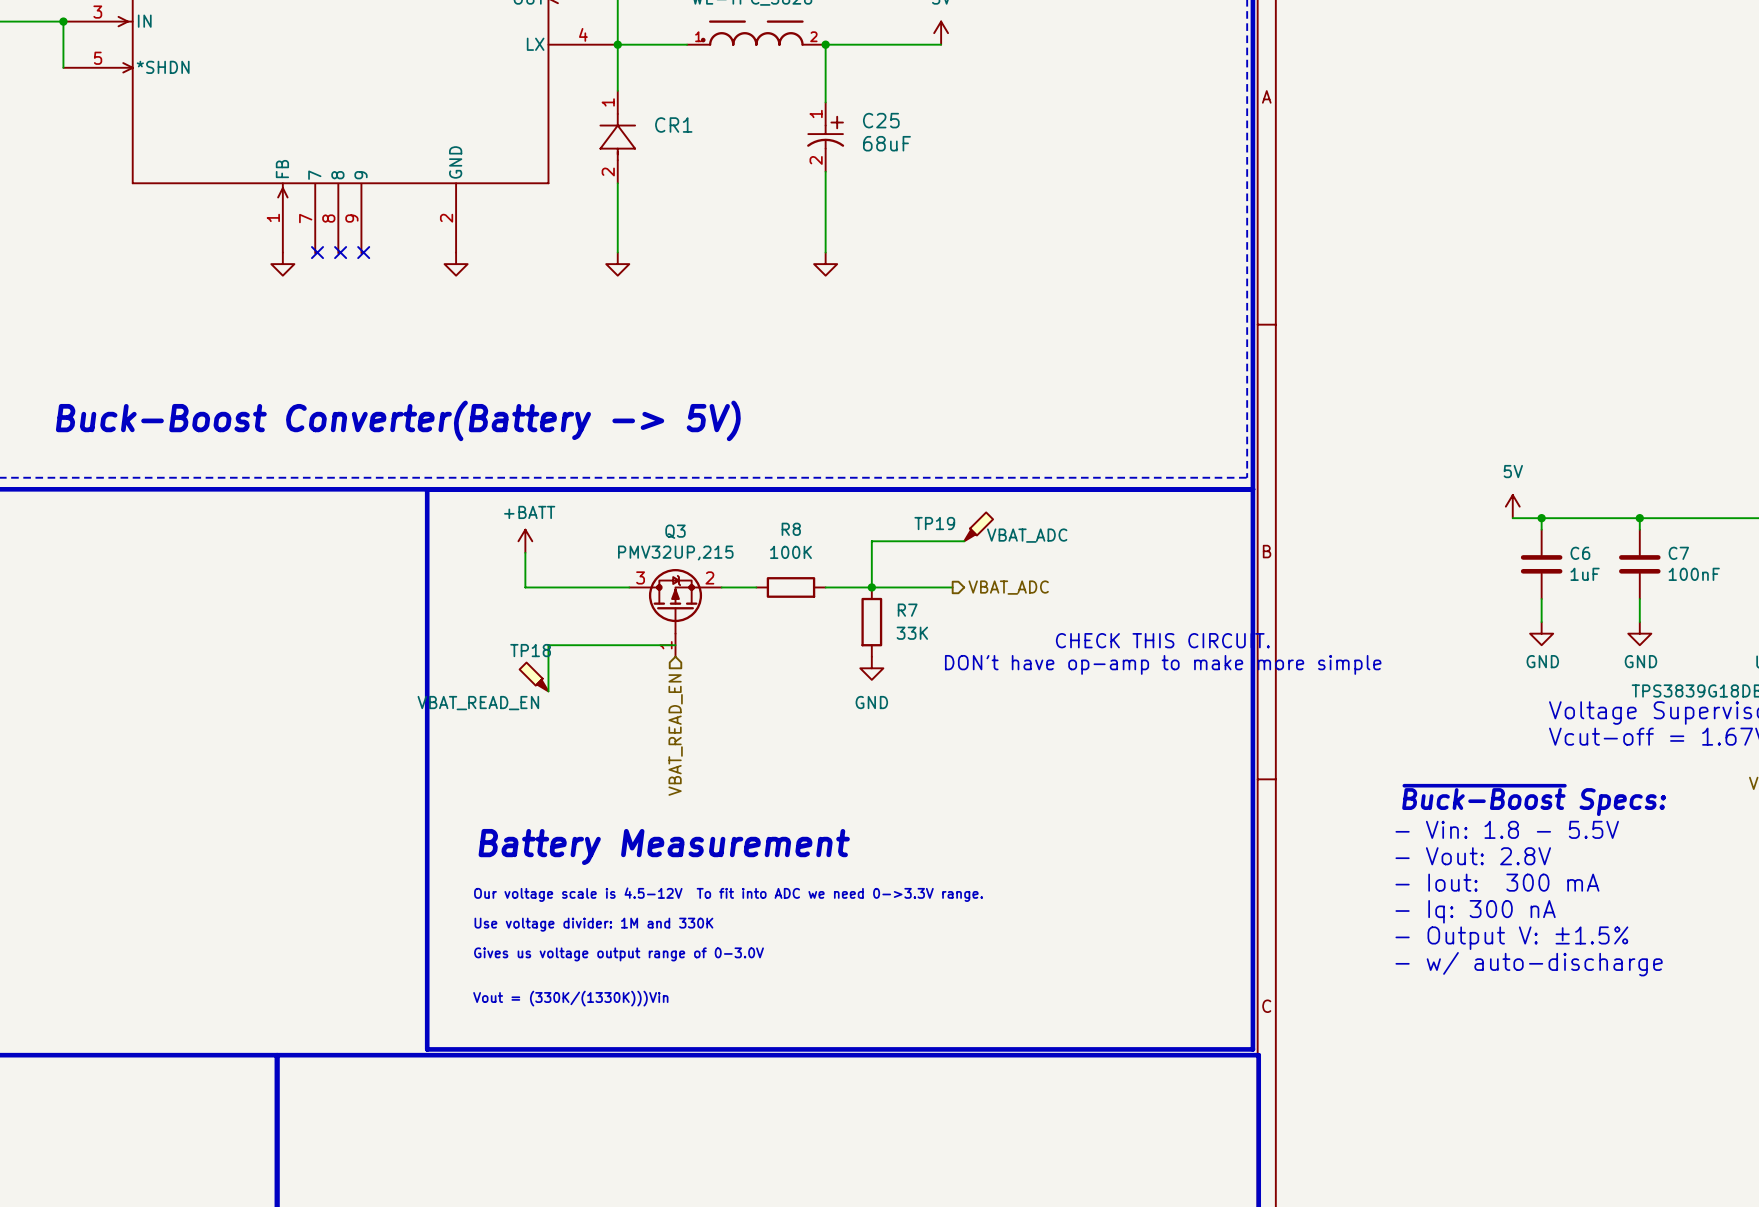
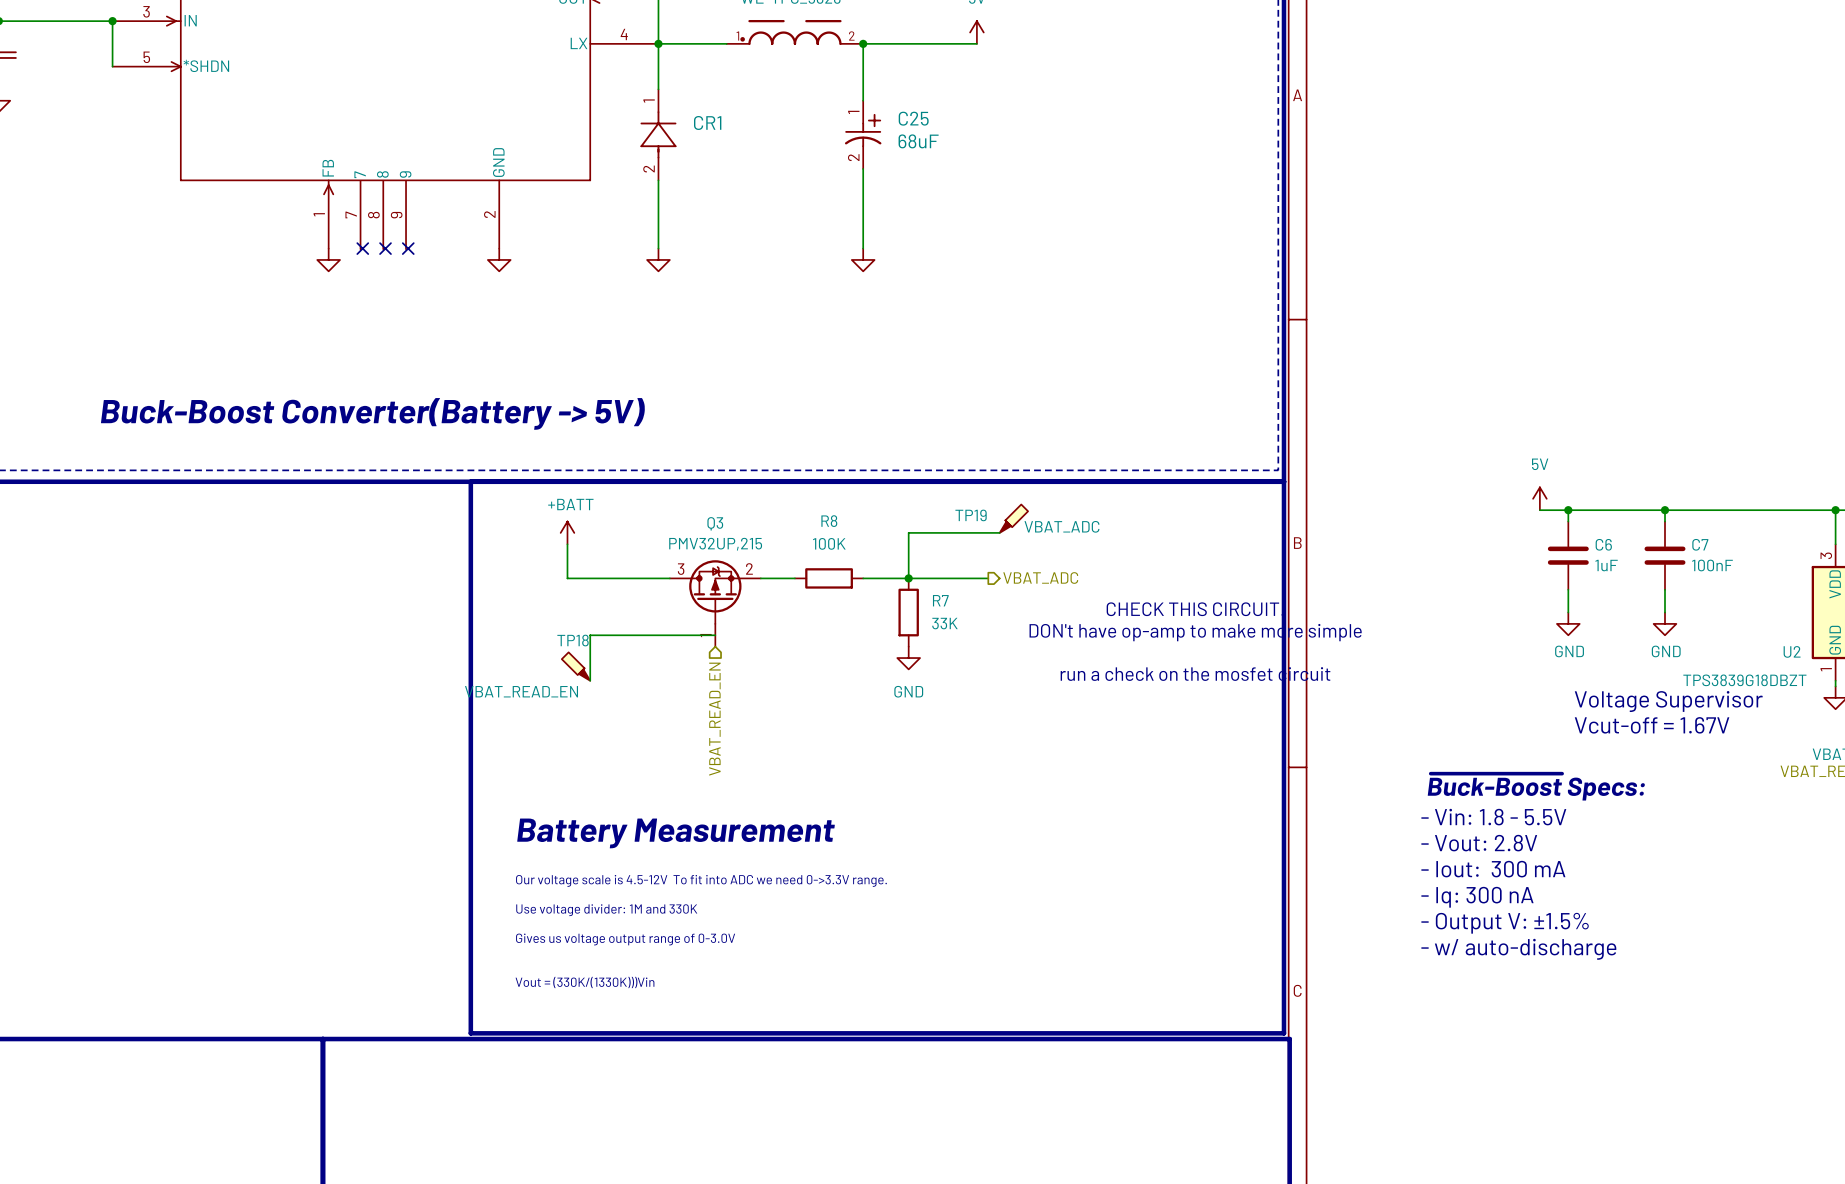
text: none -> CHECK THIS CIRCUIT. (1195, 609)
text: CHECK THIS CIRCUIT. (1162, 640) -> DON't have op-amp to make more simple (1195, 632)
text: DON't have op-amp to make more simple (1163, 664) -> none
text: none -> run a check on the mosfet circuit (1195, 674)

